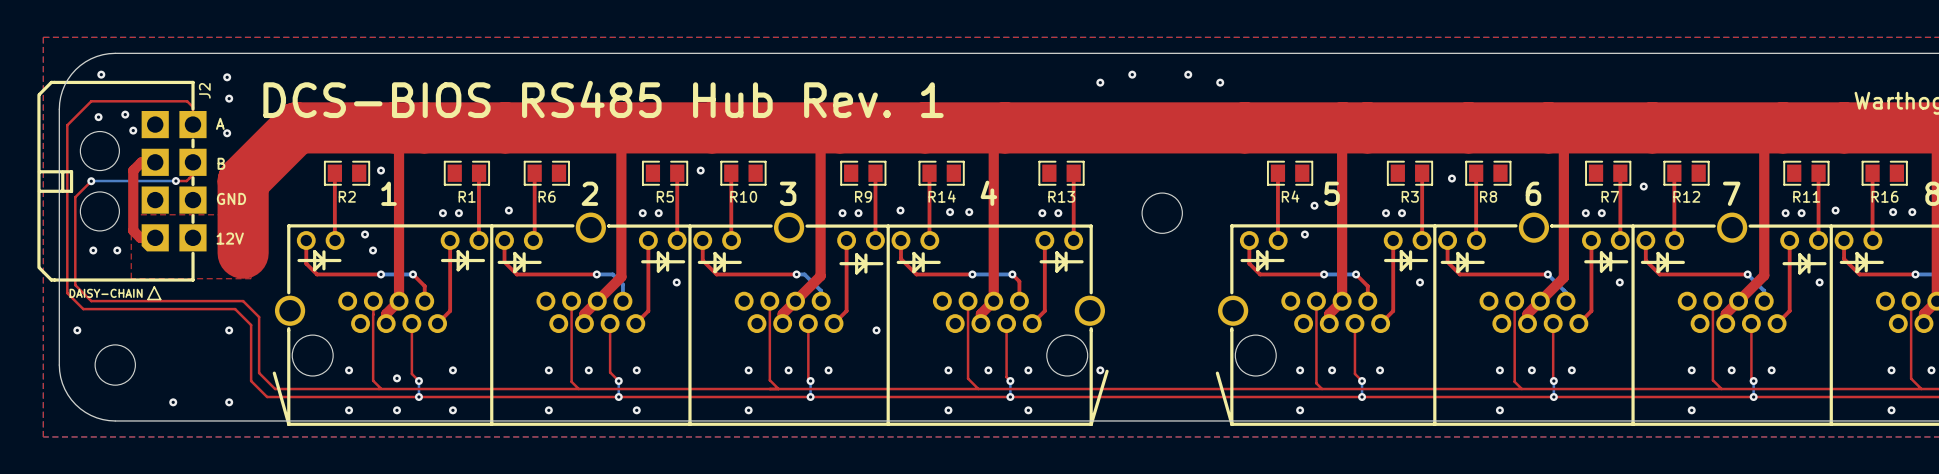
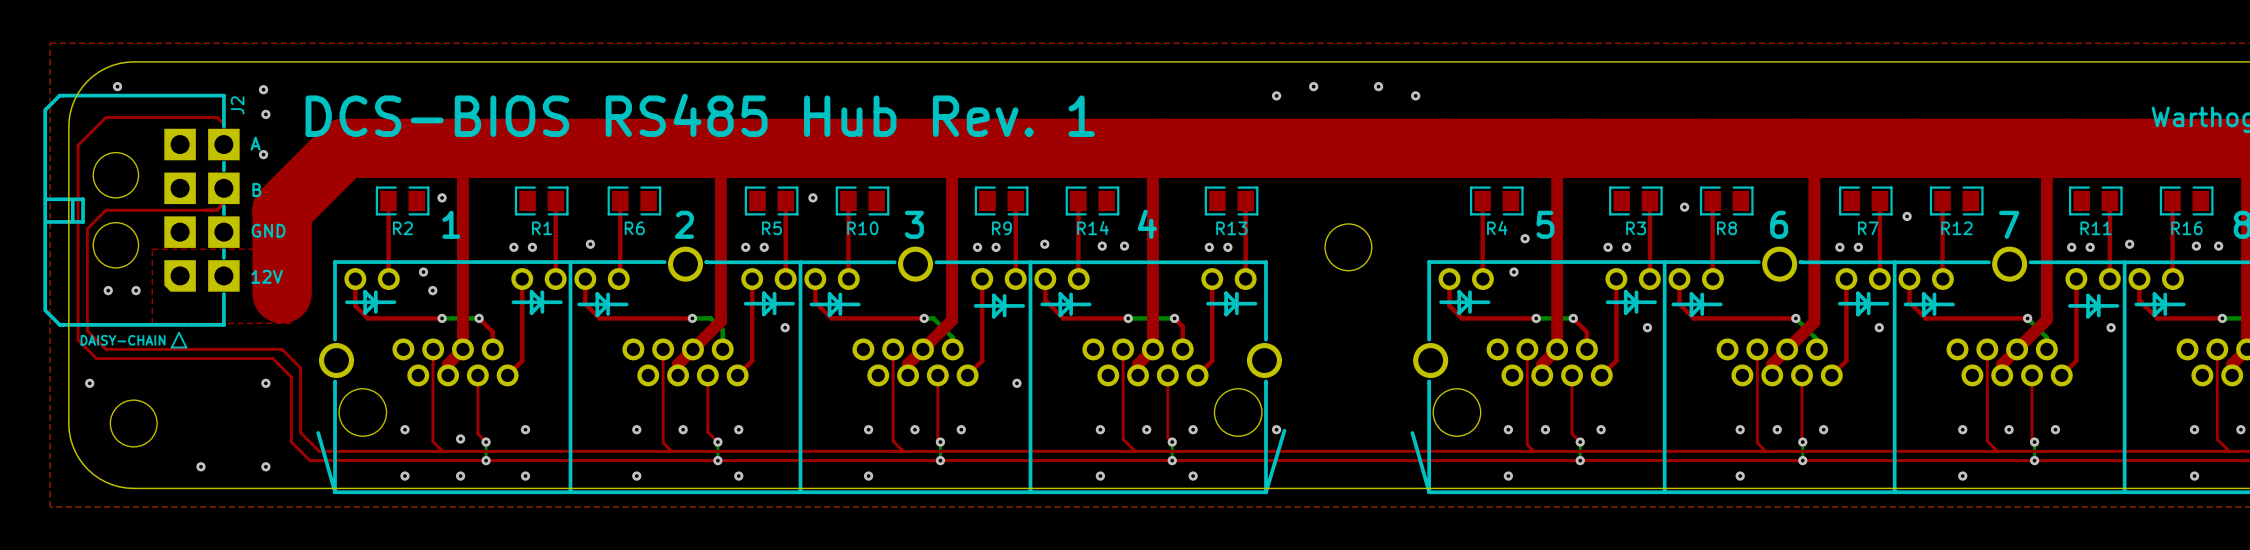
via: (125, 114) -> none
via: (98, 117) -> none
via: (133, 130) -> none
top track: (155, 162) (141, 162) (133, 170) (133, 230) (140, 237) (155, 237) -> none
top track: none -> (223, 203) (217, 210) (105, 210)
via: (91, 181) -> none
bottom track: (175, 181) (91, 181) -> none
via: (175, 181) -> none

